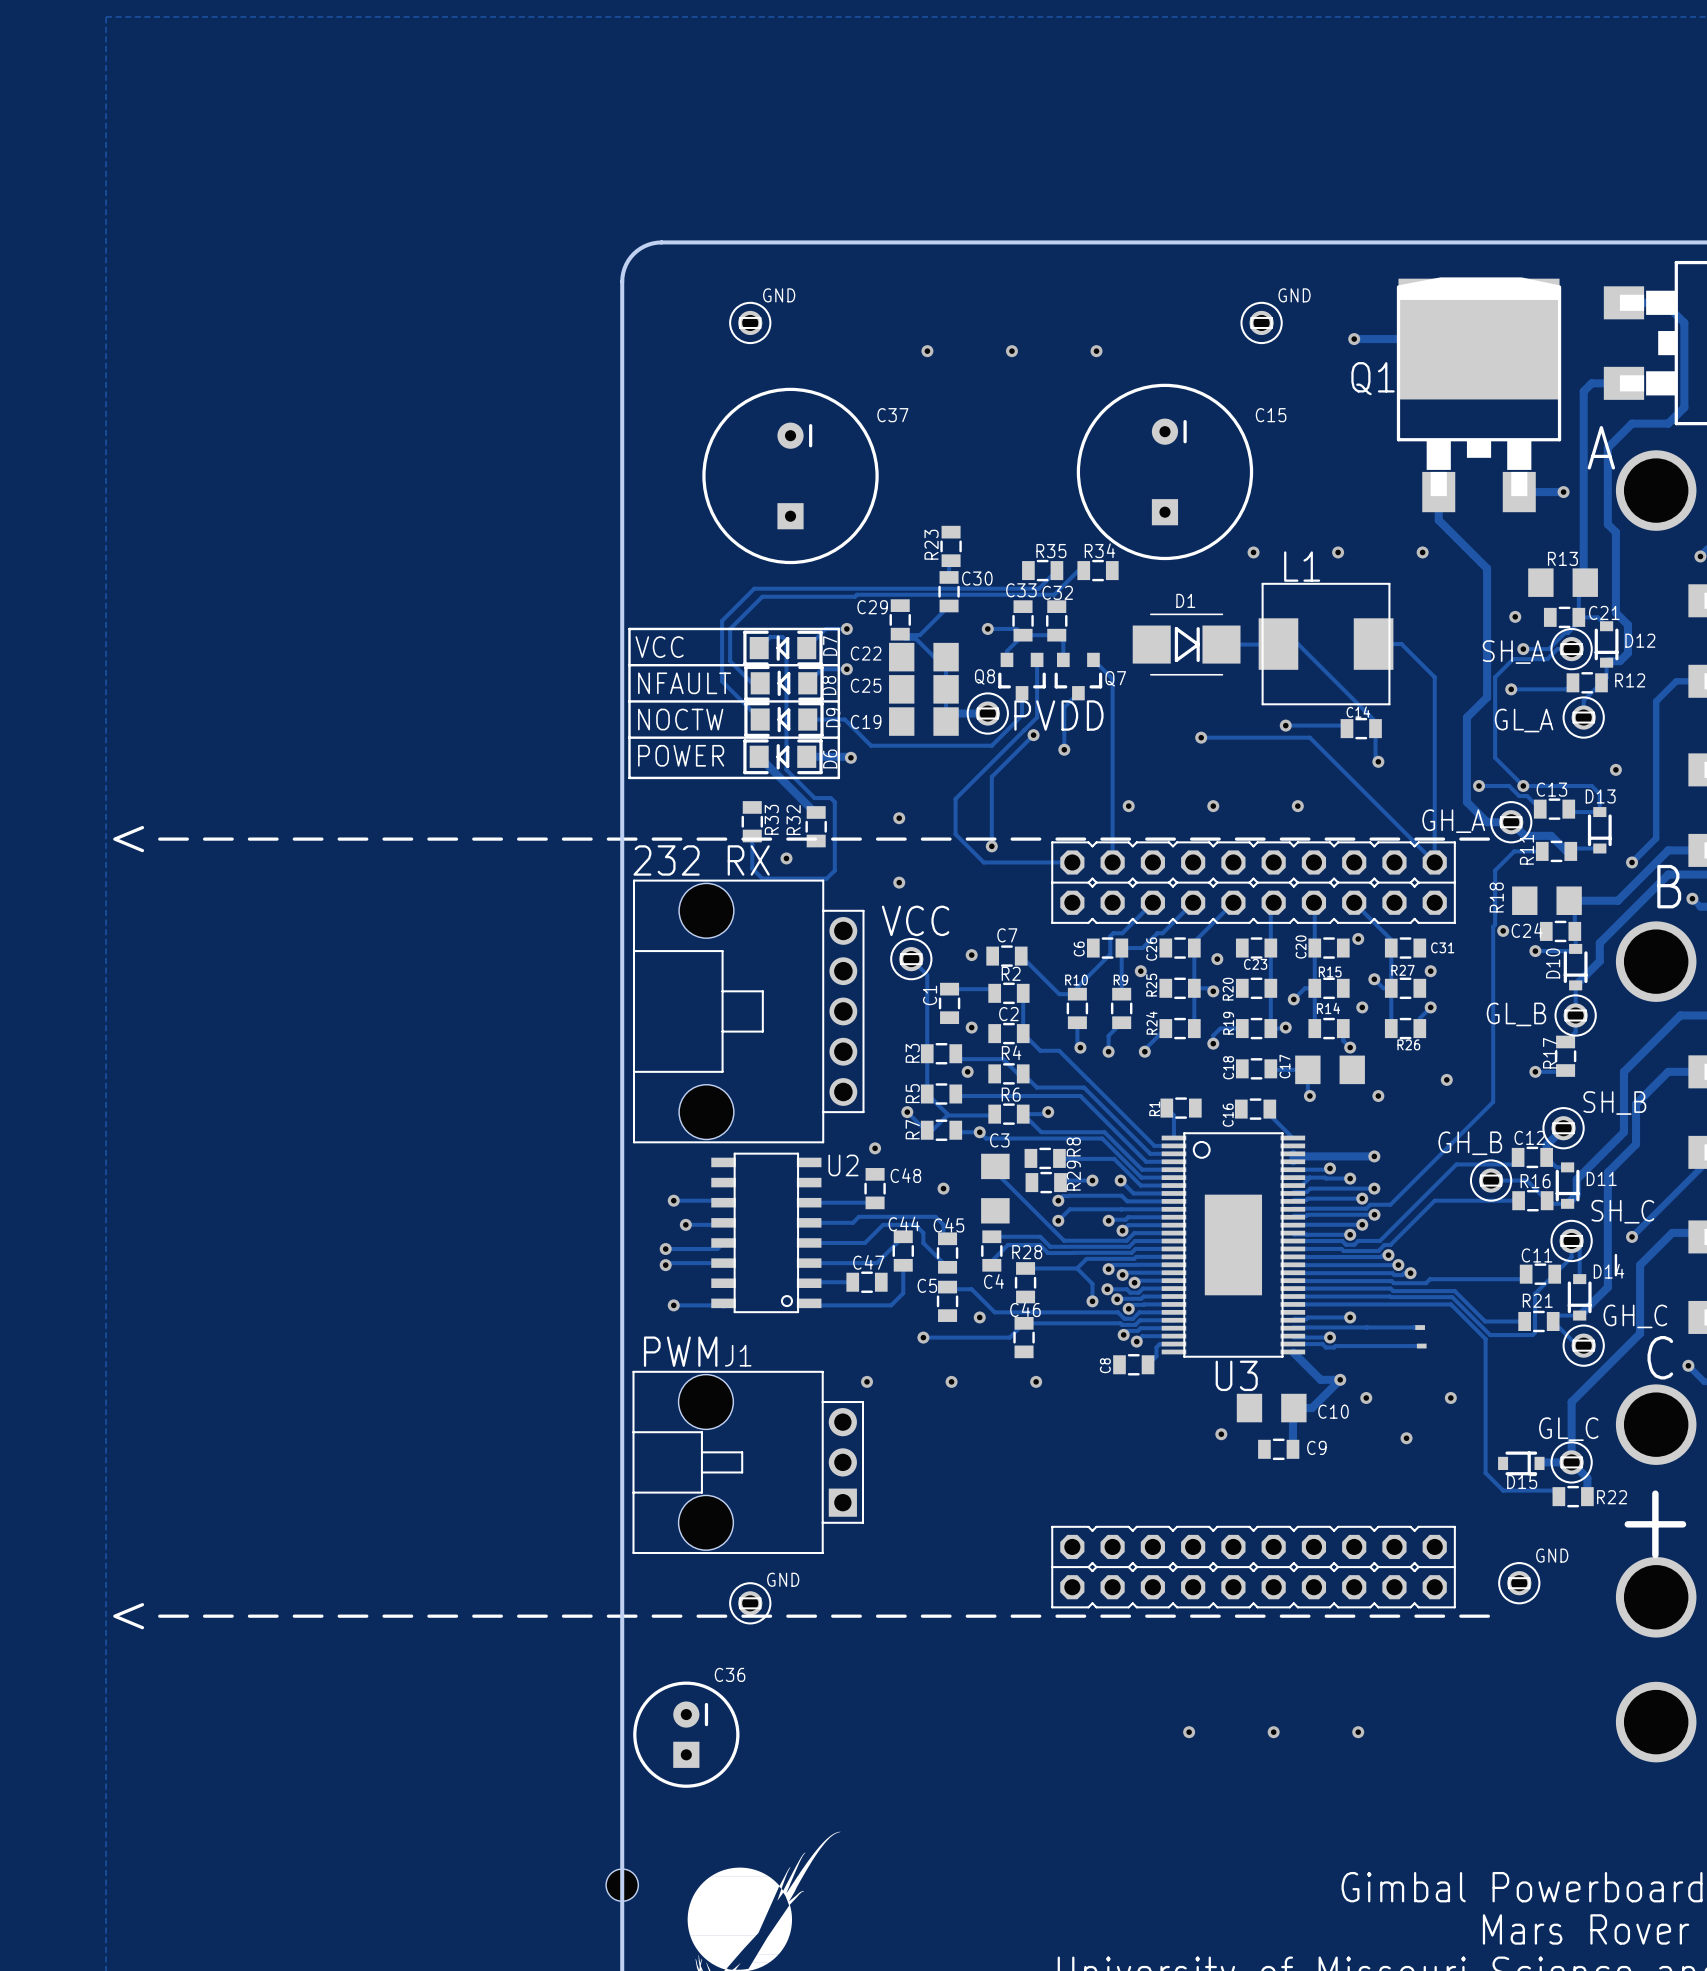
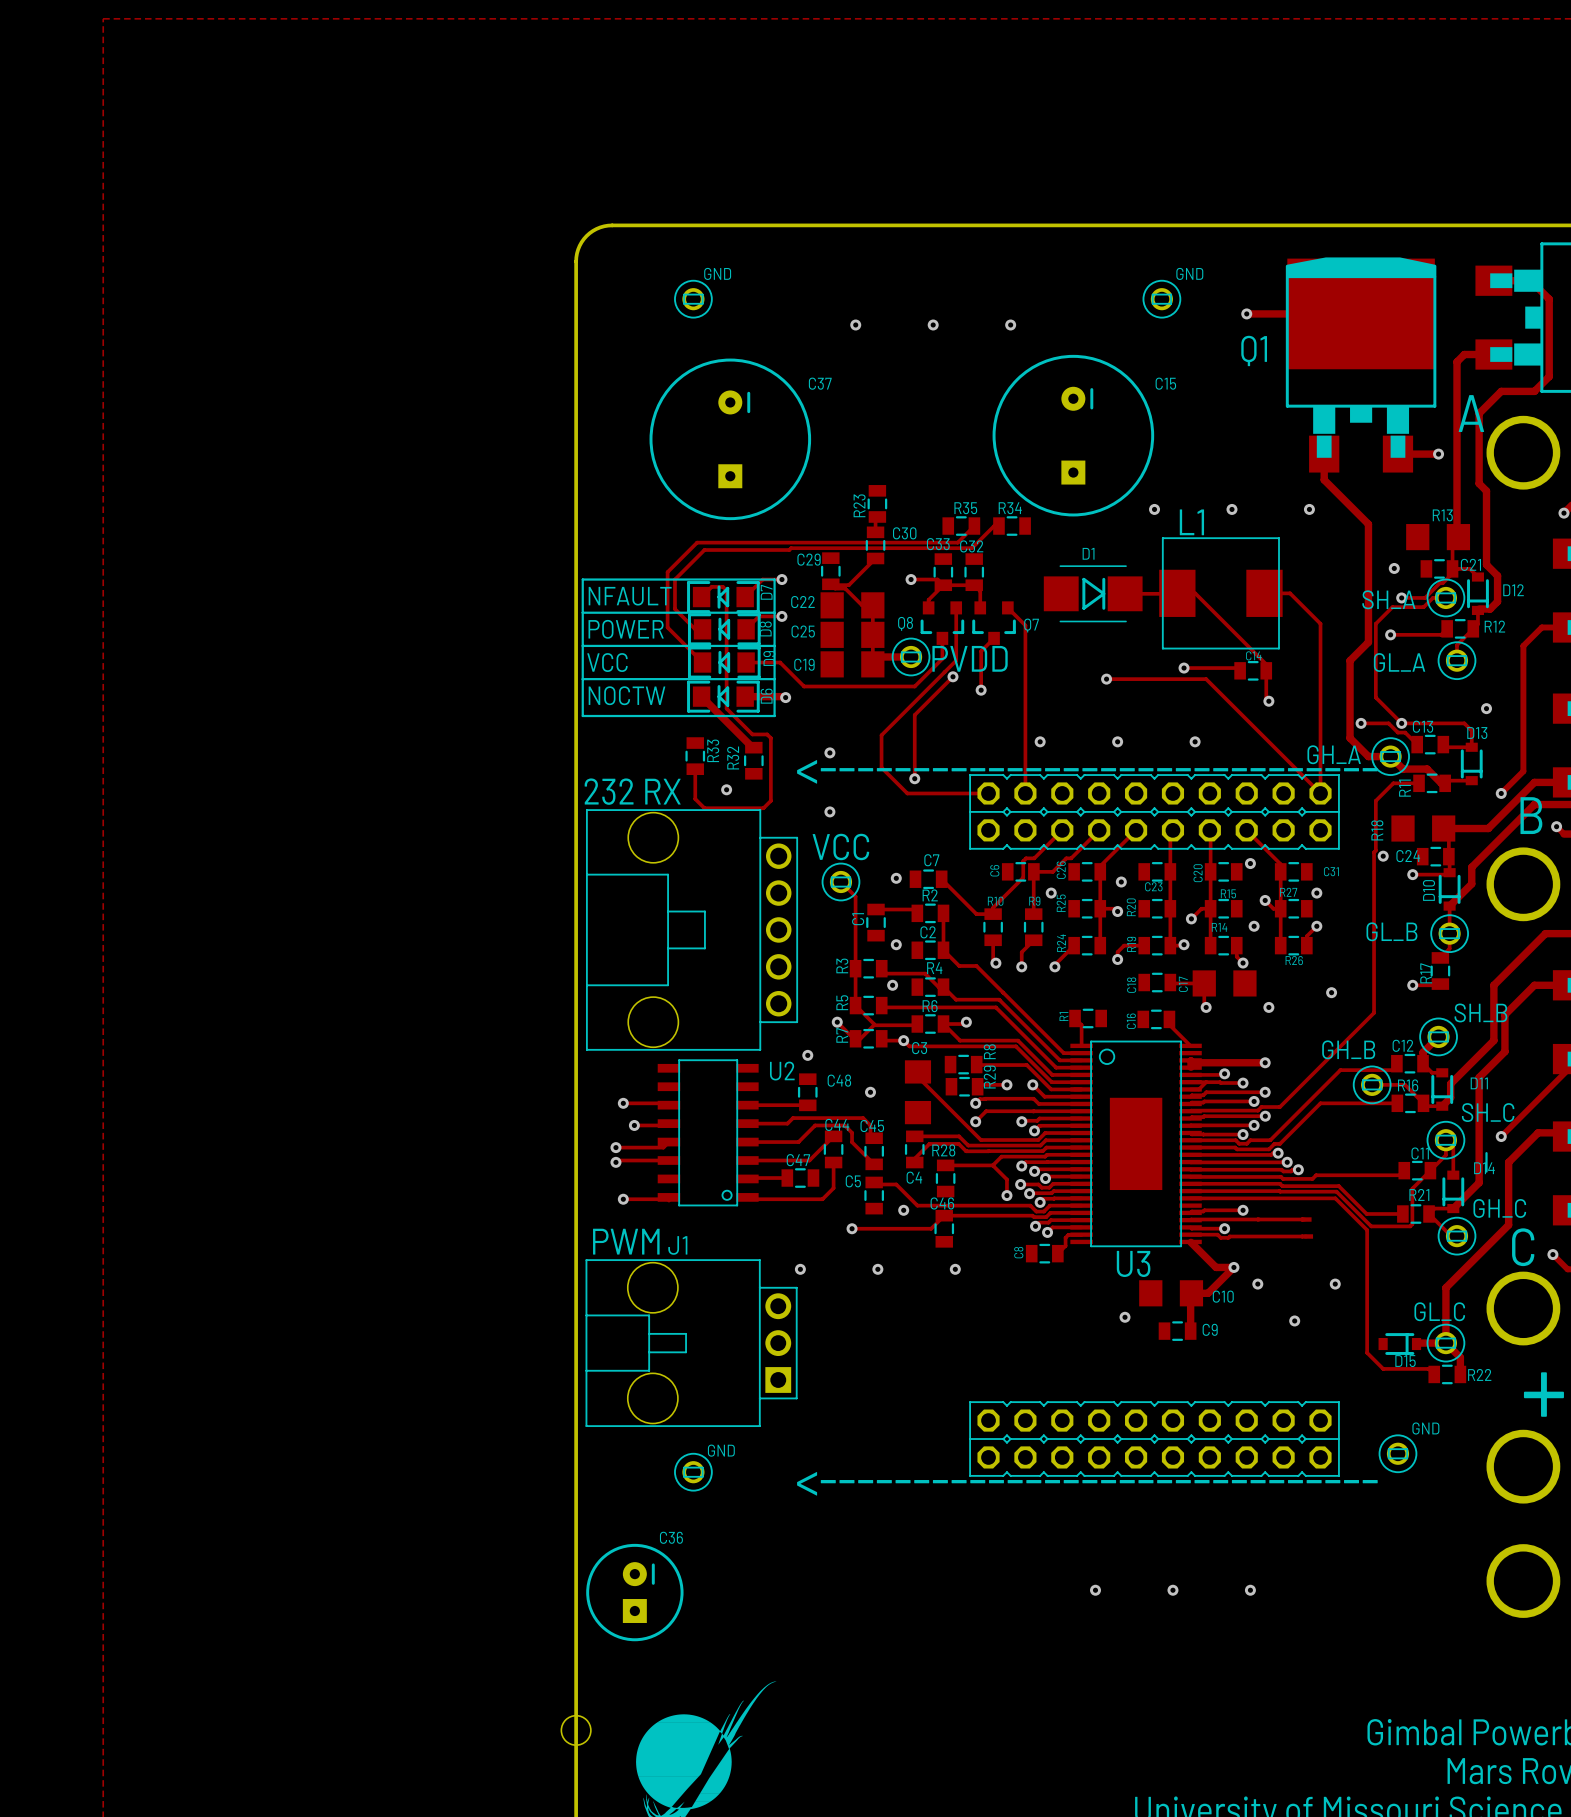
text: VCC (659, 647) -> NFAULT (630, 596)
text: NFAULT (684, 683) -> POWER (626, 629)
text: NOCTW (680, 719) -> VCC (607, 662)
text: POWER (681, 755) -> NOCTW (626, 695)

